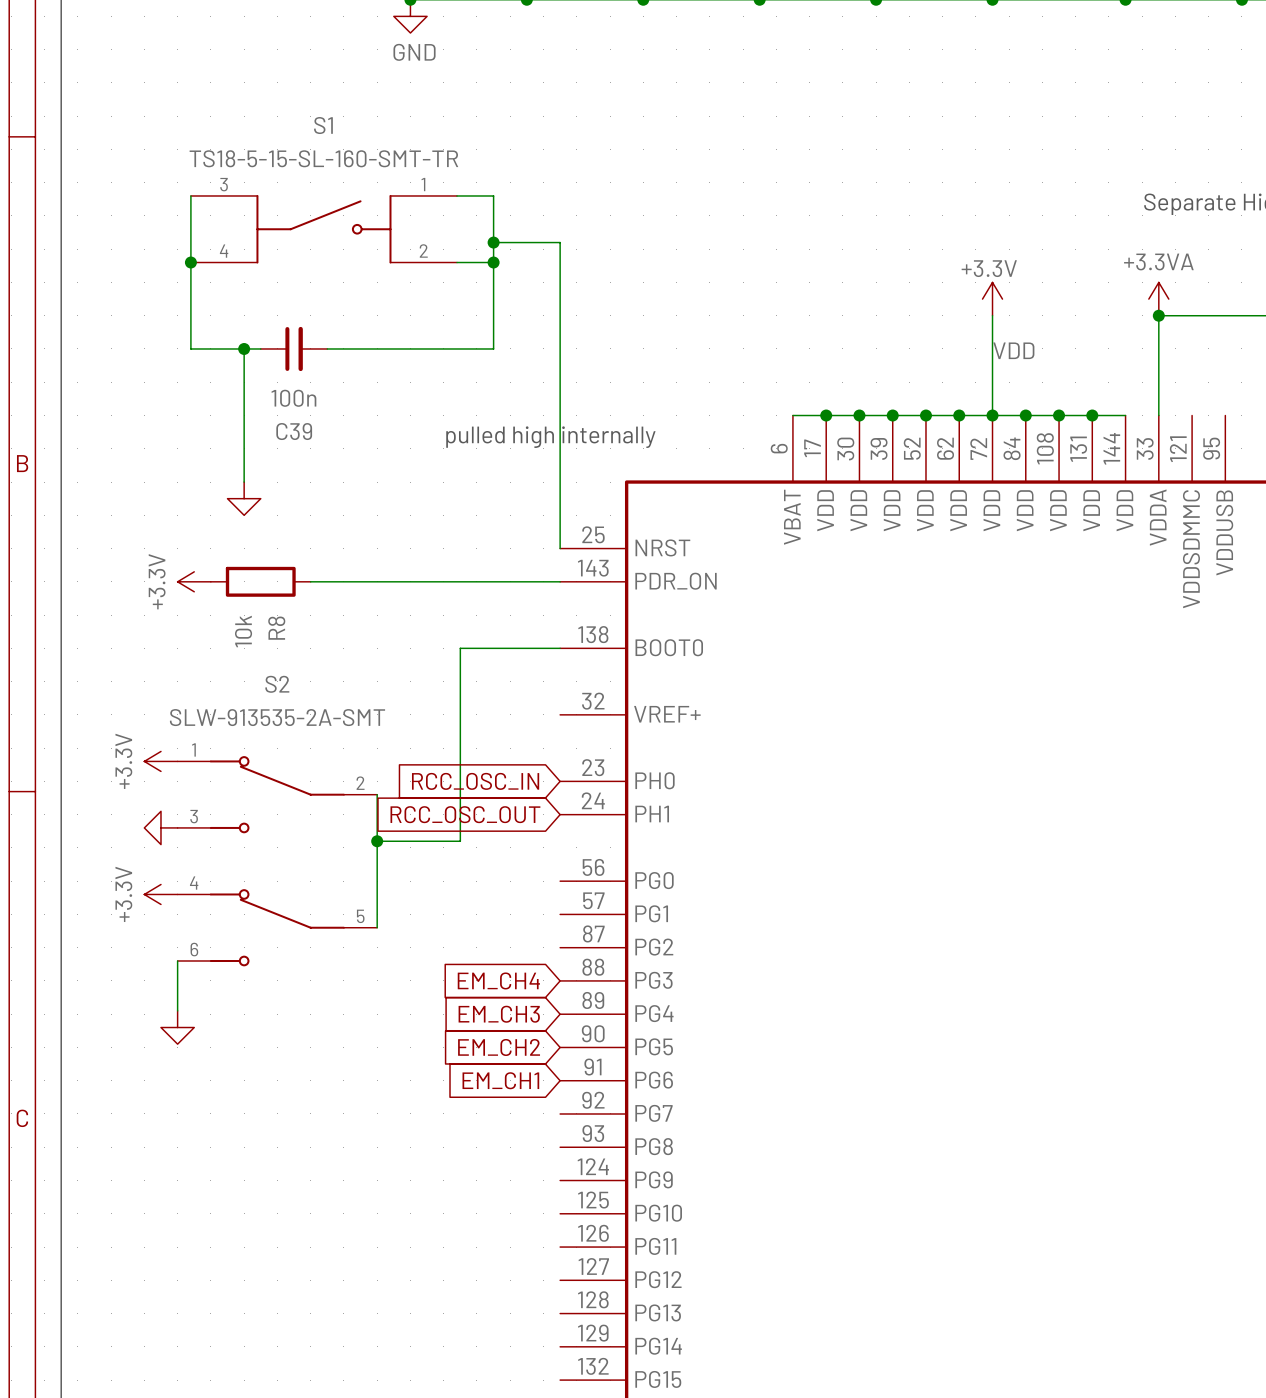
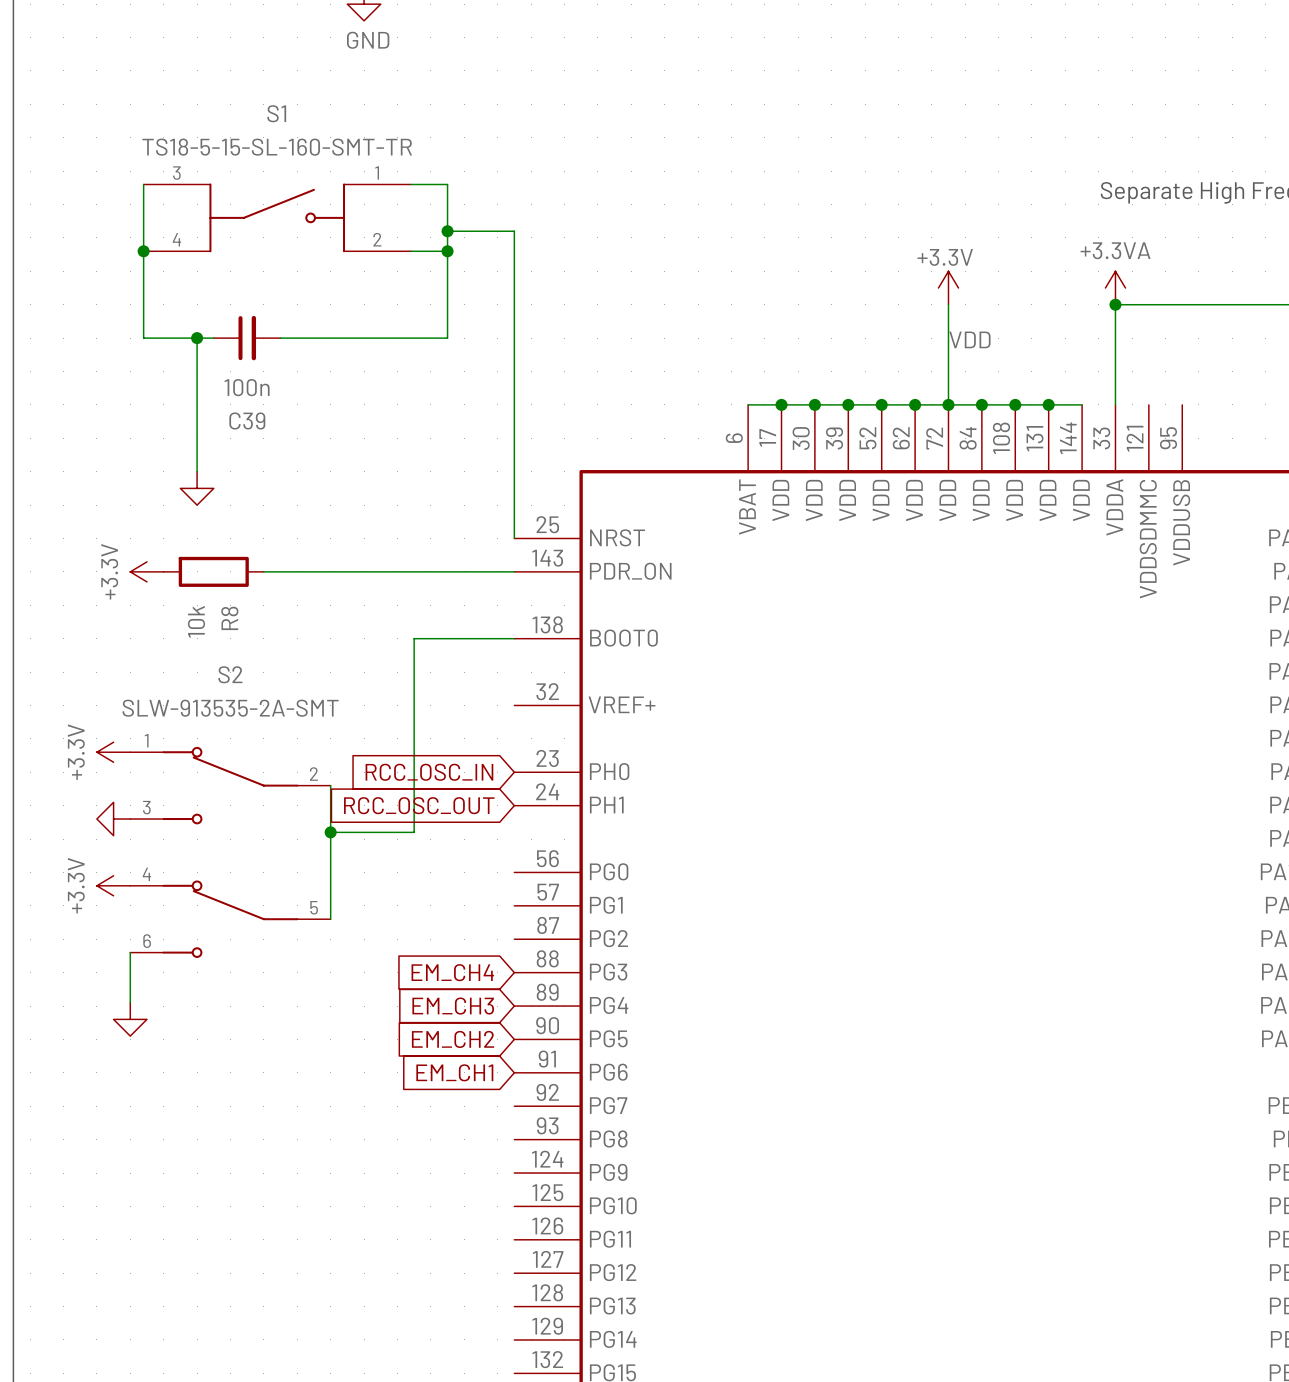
text: pulled high internally (550, 437) -> none

